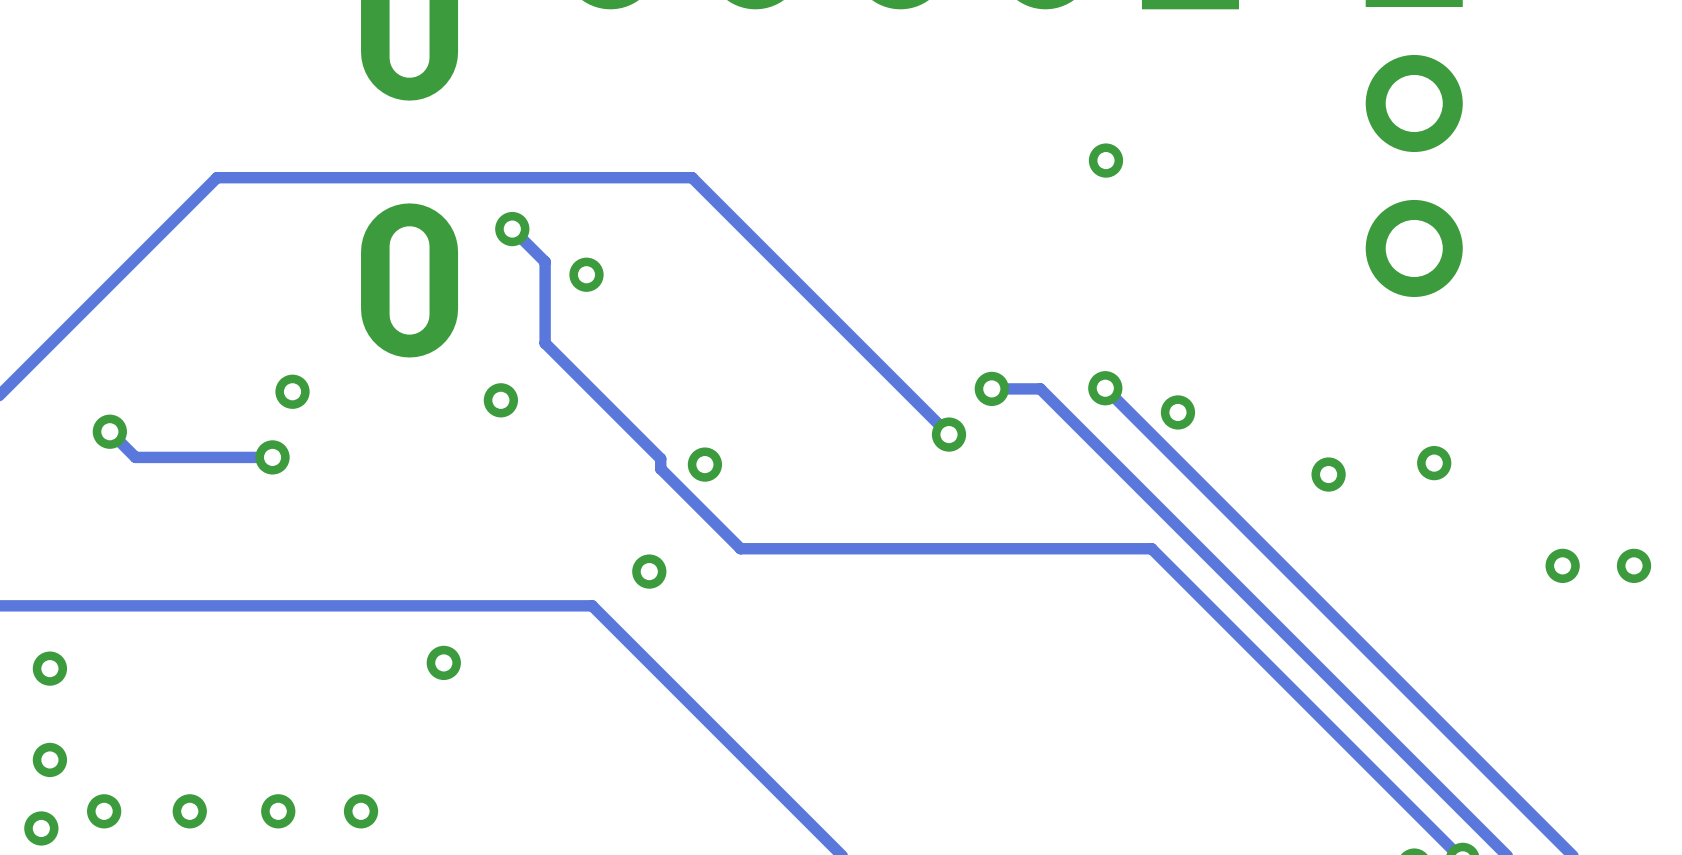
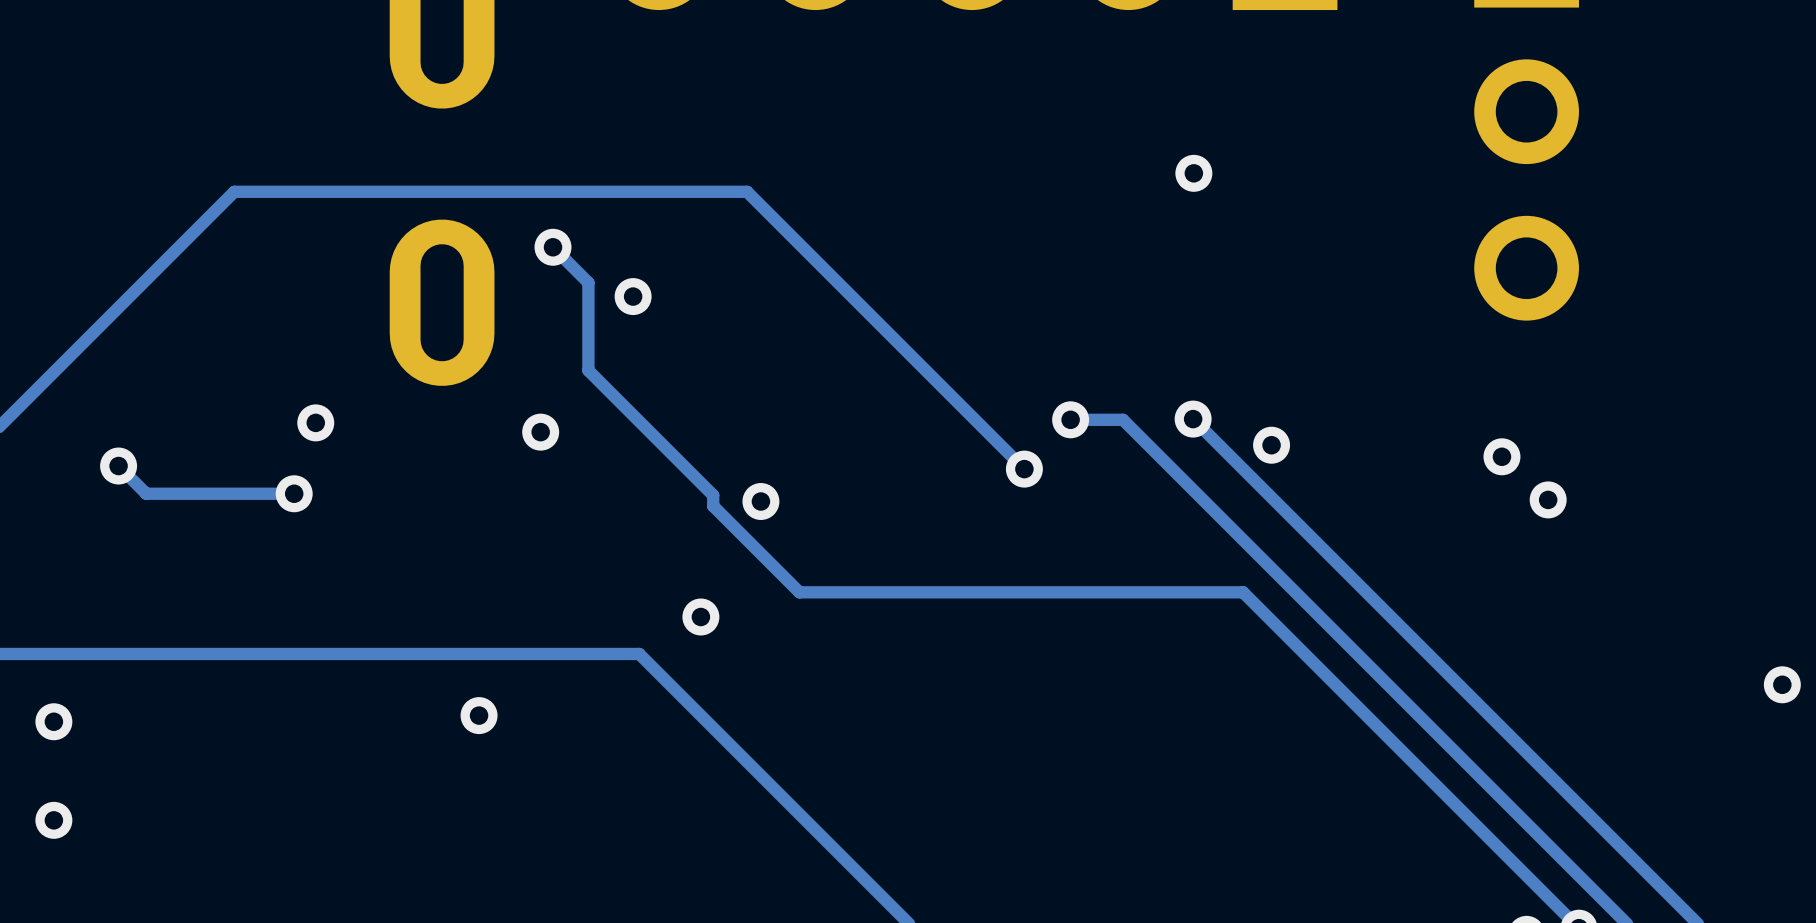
via position: (1328, 474) -> (1501, 456)
via: (1562, 565) -> none
via: (1634, 565) -> none
via: none -> (1782, 684)
via: (104, 811) -> none
via: (189, 811) -> none
via: (278, 811) -> none
via: (361, 811) -> none
via: (41, 828) -> none

